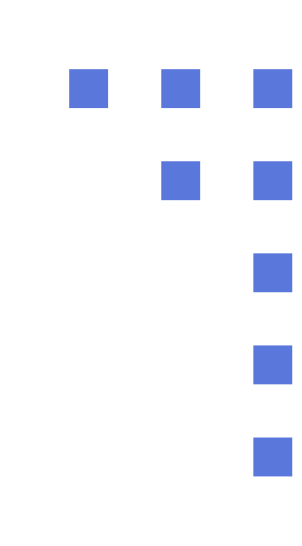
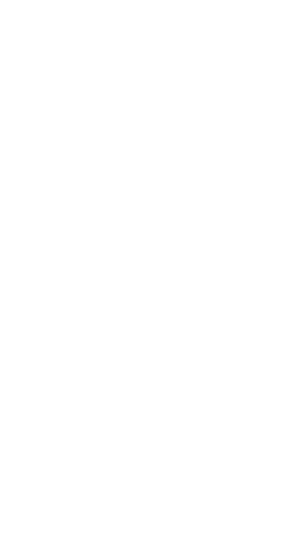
part: (88, 88) -> none
part: (180, 88) -> none
part: (272, 88) -> none
part: (180, 180) -> none
part: (272, 180) -> none
part: (272, 272) -> none
part: (272, 364) -> none
part: (272, 456) -> none

